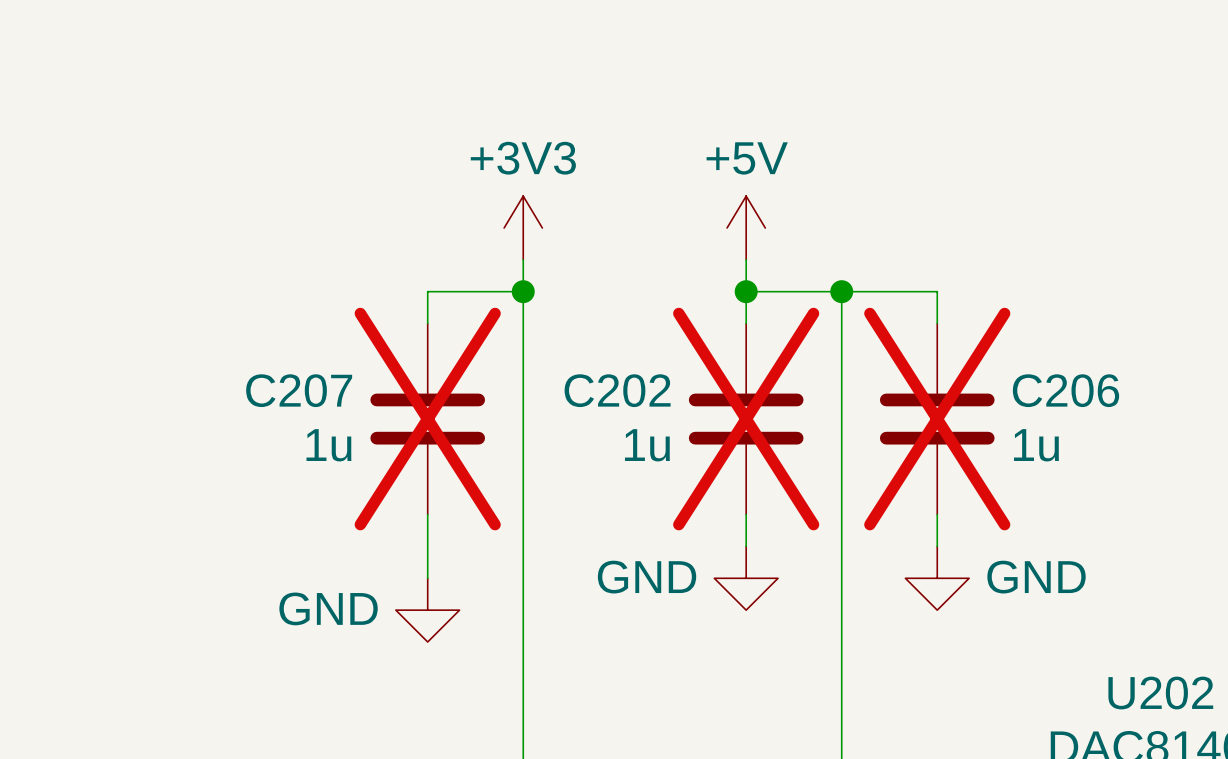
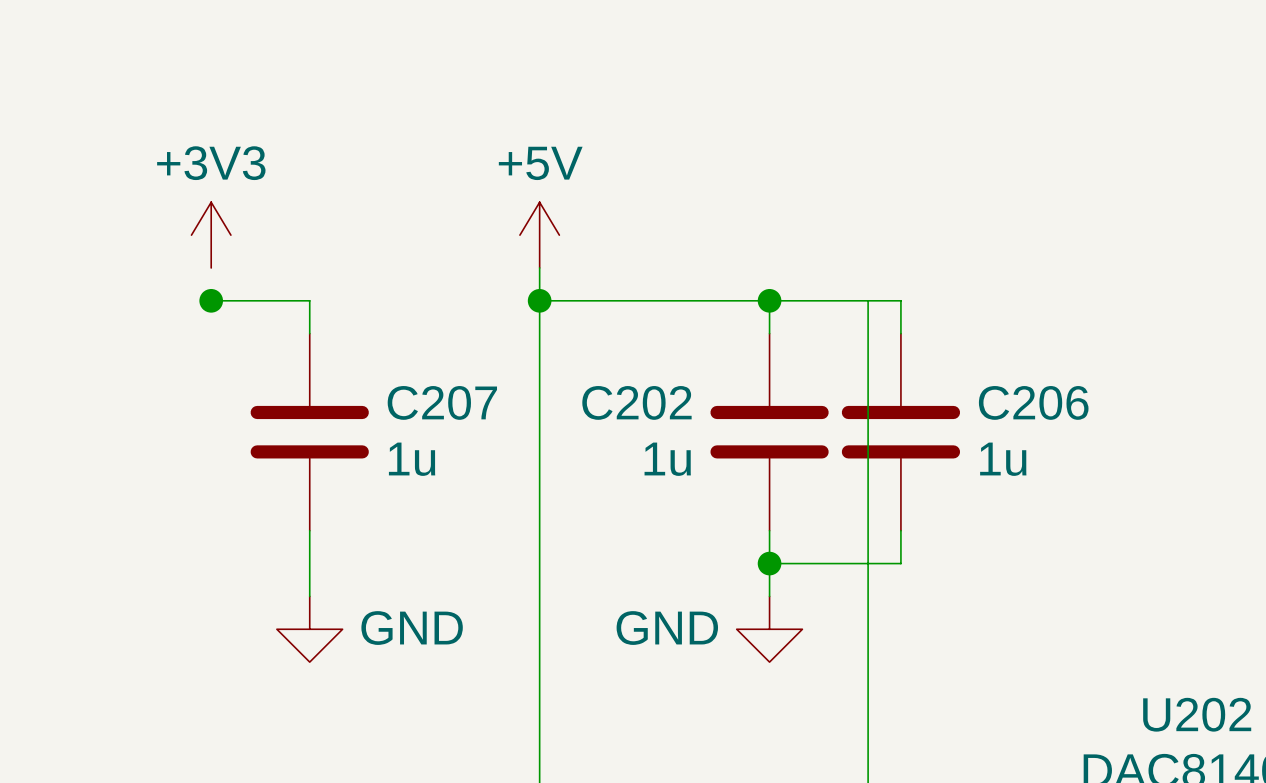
power symbol: none -> +3V3 (211, 235)
power symbol: +3V3 (523, 227) -> +5V (539, 235)
power symbol: +5V (746, 227) -> none
wire: (746, 259) (746, 291) -> (539, 300) (769, 300)
wire: none -> (211, 300) (309, 300) (309, 333)
junction: none -> (211, 300)
wire: (523, 291) (427, 291) (427, 323) -> none
junction: (841, 291) -> none
wire: (873, 291) (937, 291) (937, 323) -> (900, 300) (900, 333)
C207 name position: C207 (299, 390) -> C207 (442, 402)
C207 position: (427, 419) -> (309, 432)
C207 do-not-place cross: (427, 419) -> none
C202 do-not-place cross: (746, 419) -> none
C206 position: (937, 419) -> (900, 432)
C206 do-not-place cross: (937, 419) -> none
C207 value position: 1u (328, 445) -> 1u (412, 459)
wire: (427, 514) (427, 578) -> (309, 530) (309, 596)
wire: none -> (900, 530) (900, 563) (769, 563) (769, 596)
wire: (937, 514) (937, 546) -> none
junction: none -> (769, 563)
power symbol position: GND (746, 578) -> GND (769, 629)
power symbol: GND (937, 578) -> none
power symbol text position: GND (328, 608) -> GND (412, 628)
power symbol position: GND (427, 610) -> GND (309, 629)

